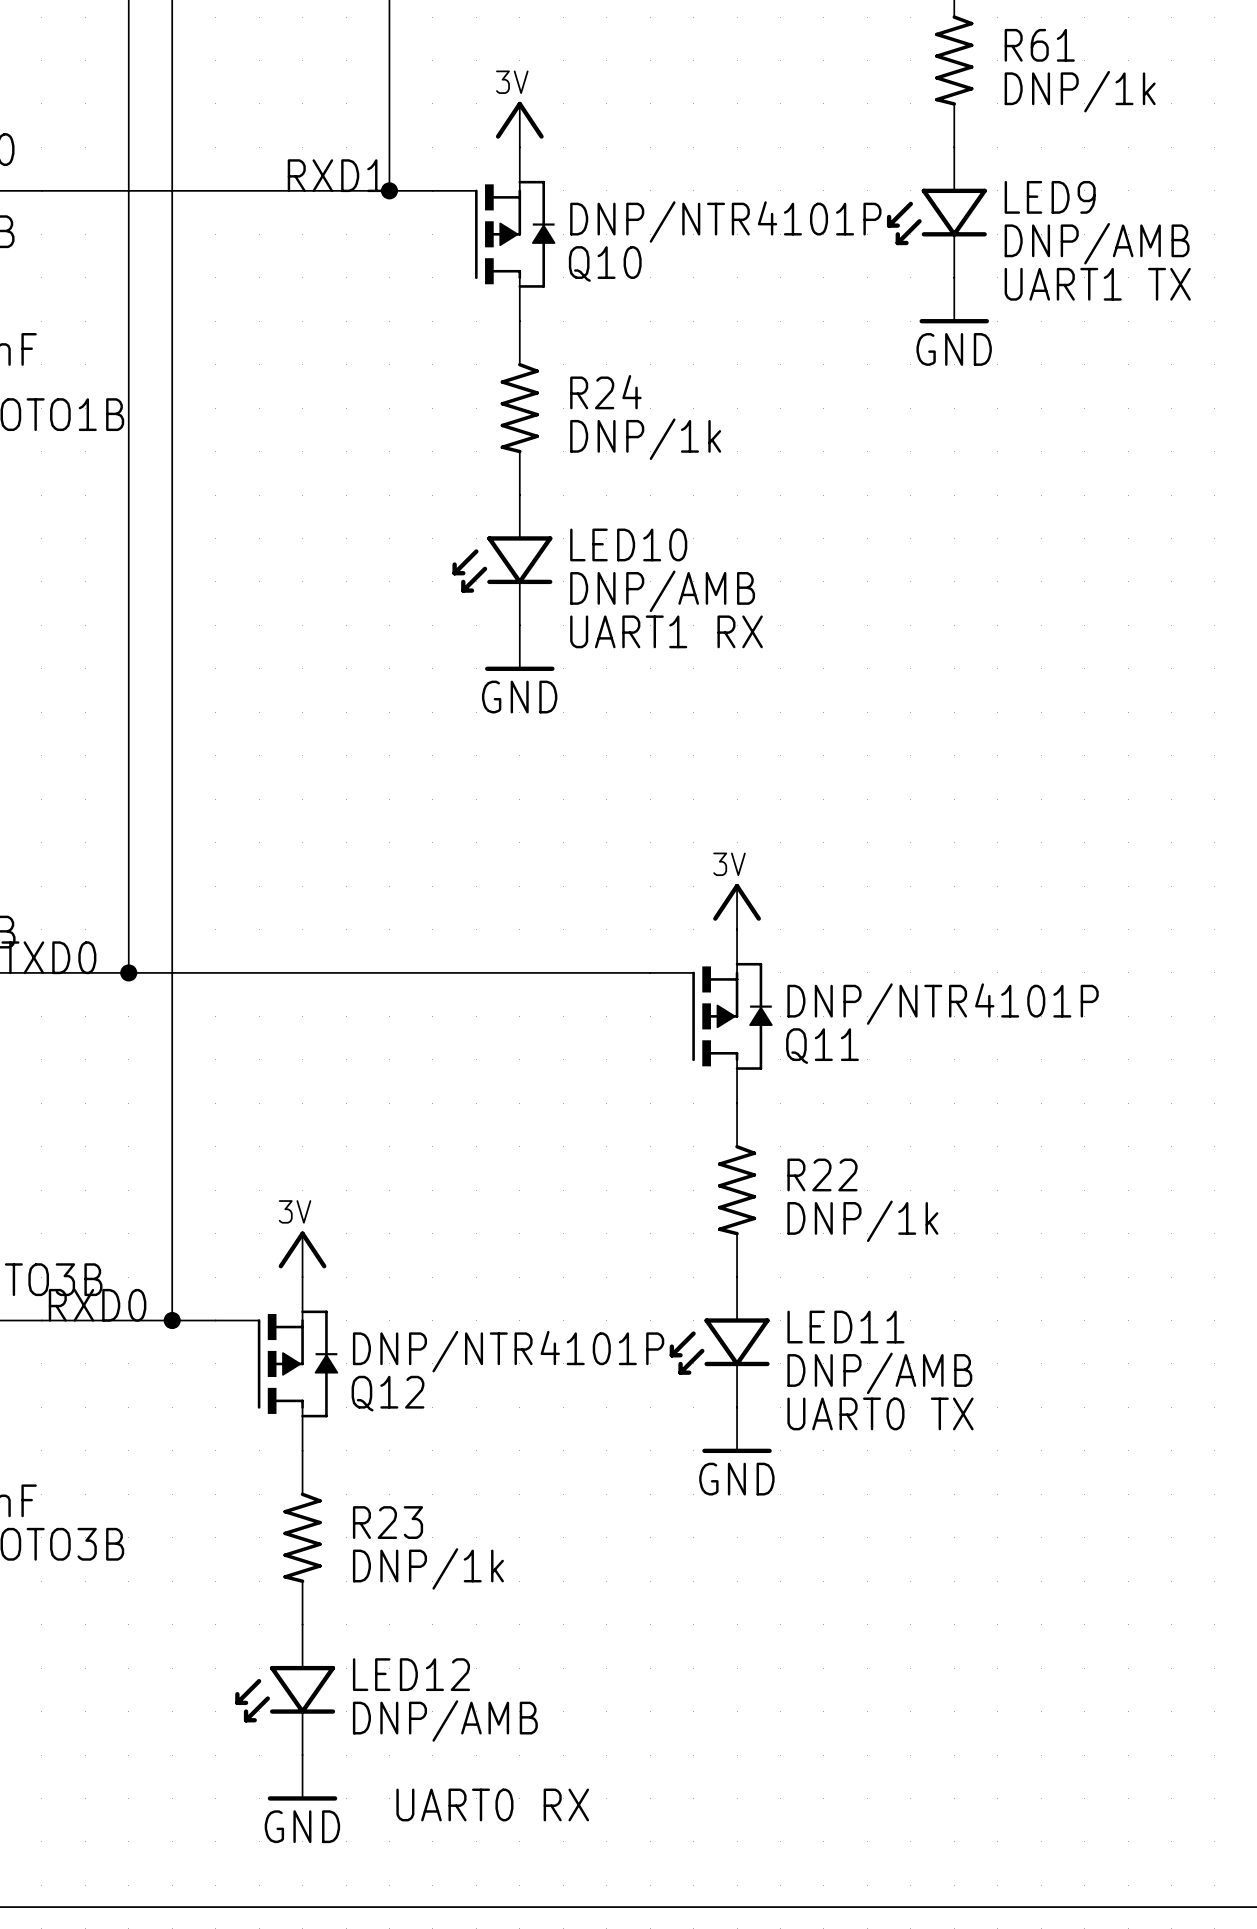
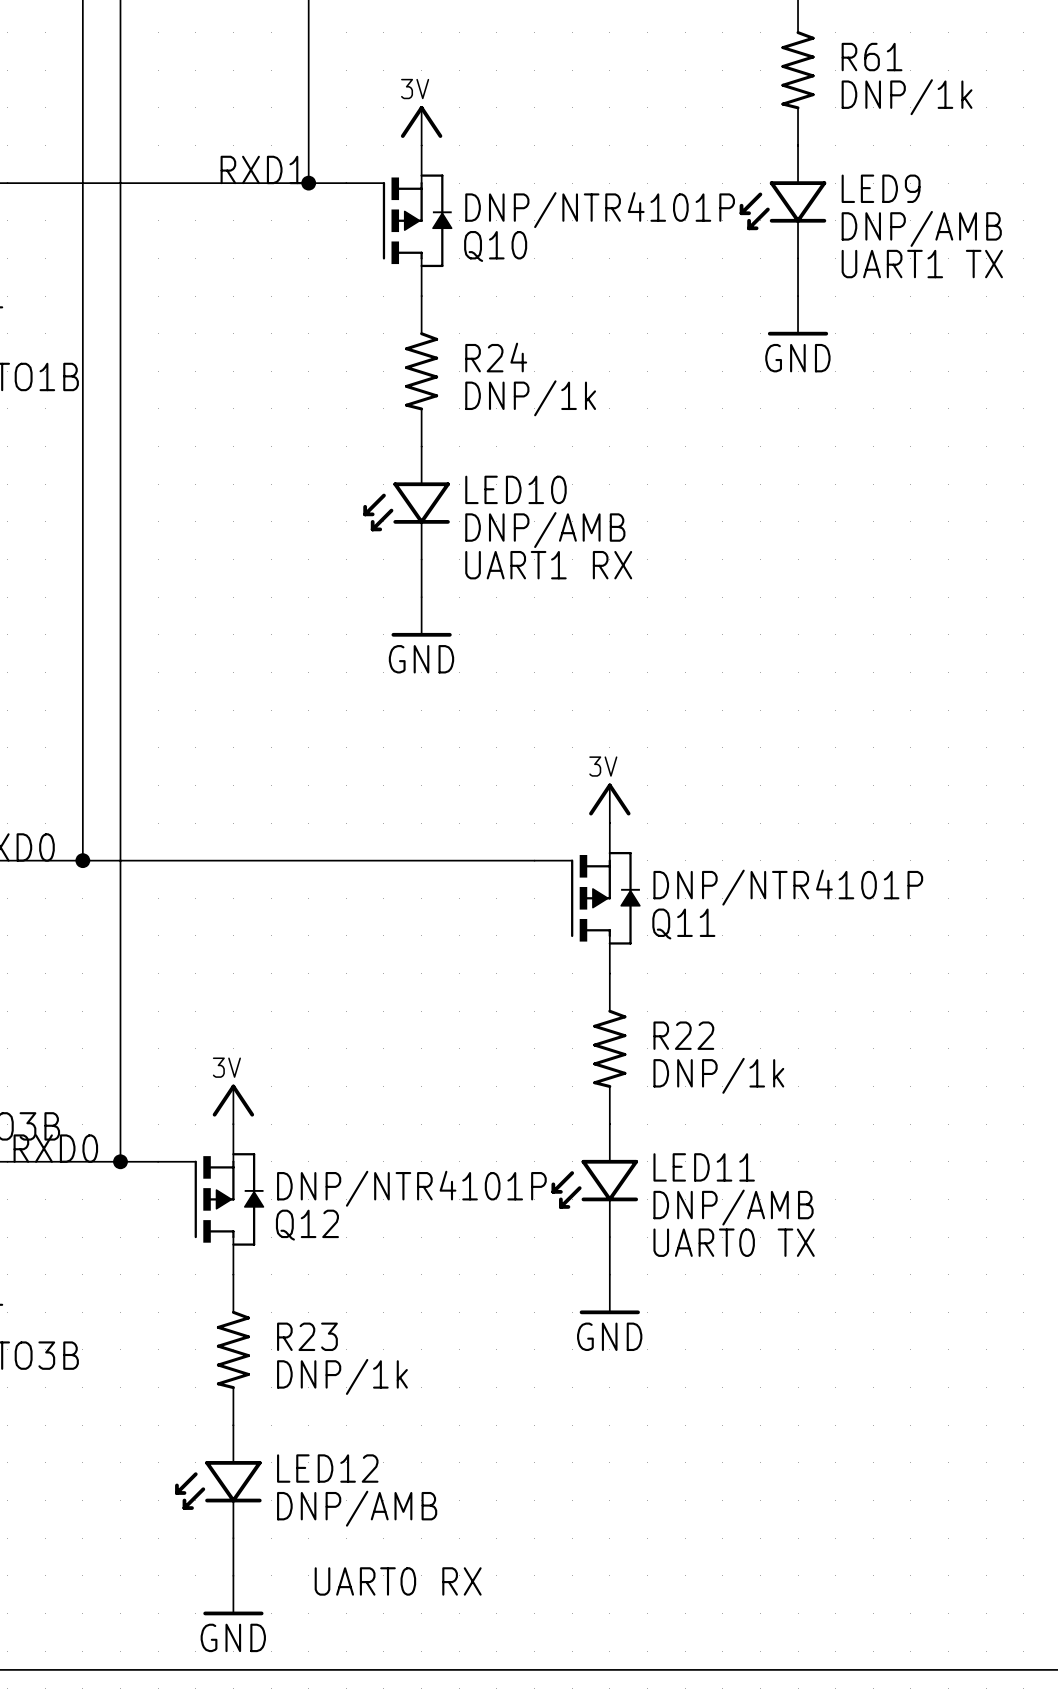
power symbol position: GND (954, 300) -> GND (798, 315)
power symbol position: GND (519, 648) -> GND (421, 616)
power symbol position: GND (737, 1430) -> GND (609, 1294)
power symbol position: GND (302, 1777) -> GND (233, 1595)

